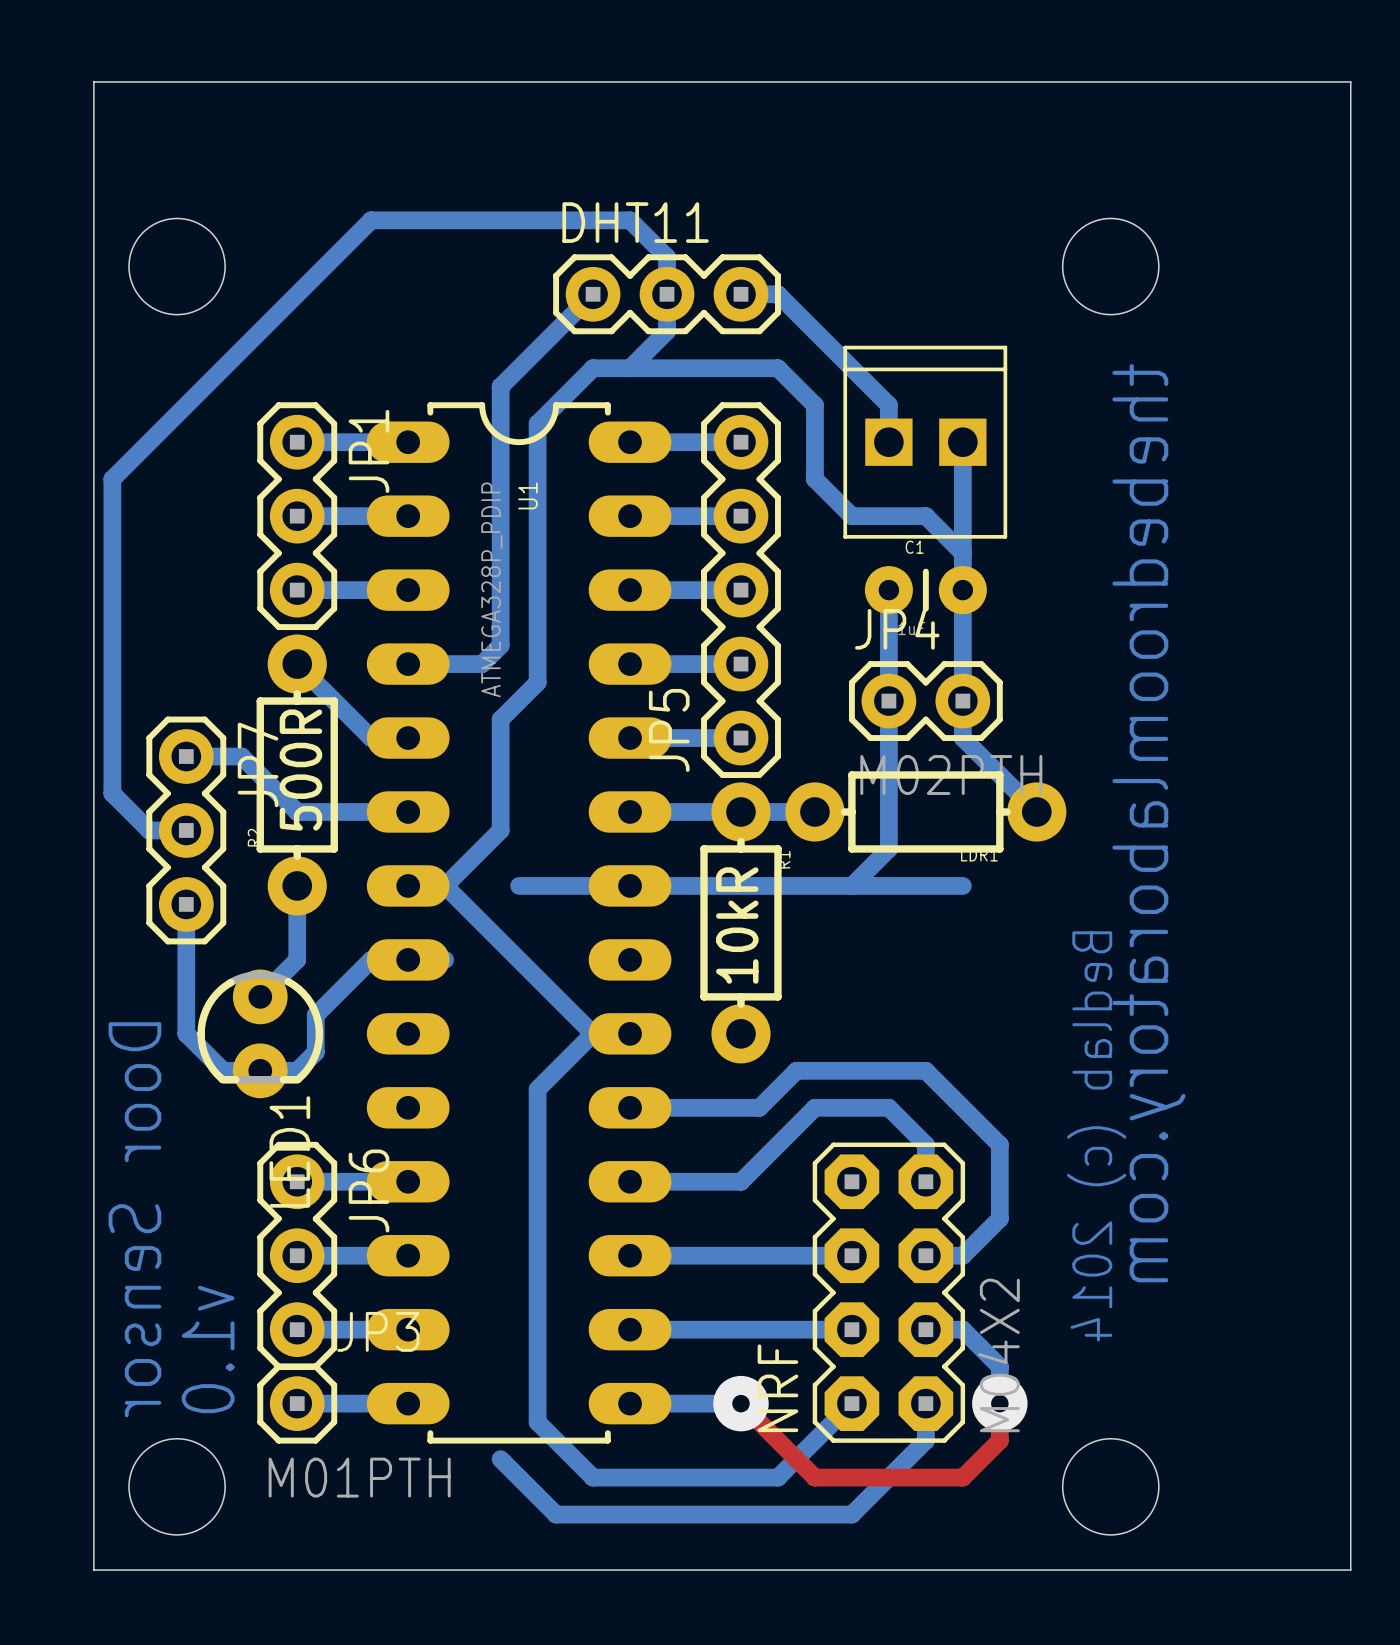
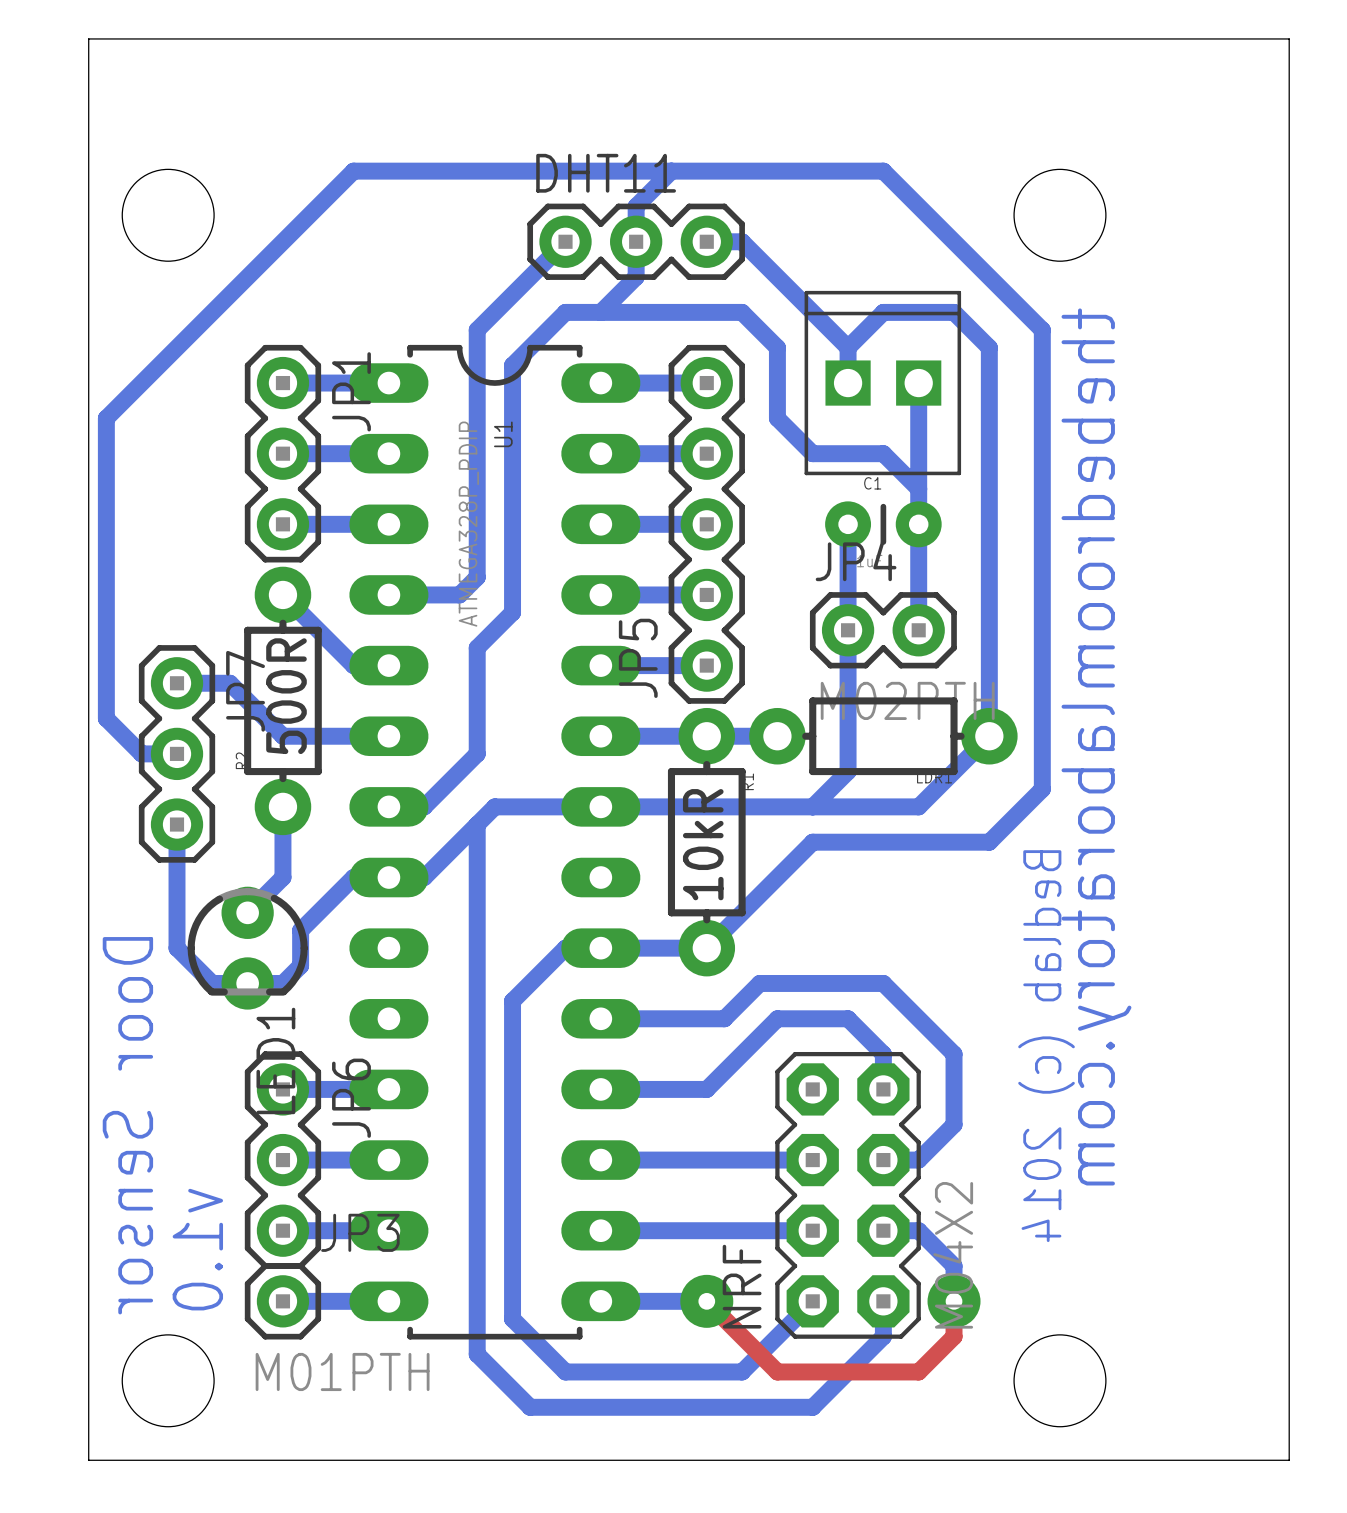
bottom track: (630, 220) (667, 257) -> (671, 171) (636, 206)
bottom track: none -> (600, 171) (883, 171) (1042, 330) (1042, 789) (989, 842) (812, 842) (706, 948) (600, 948)
bottom track: none -> (848, 347) (883, 312) (954, 312) (989, 347) (989, 736) (918, 806)
bottom track: (962, 701) (962, 738) (1036, 811) -> none
bottom track: (445, 885) (593, 1033) -> none
bottom track: none -> (494, 806) (424, 877)
bottom track: none -> (477, 824) (477, 1354)

